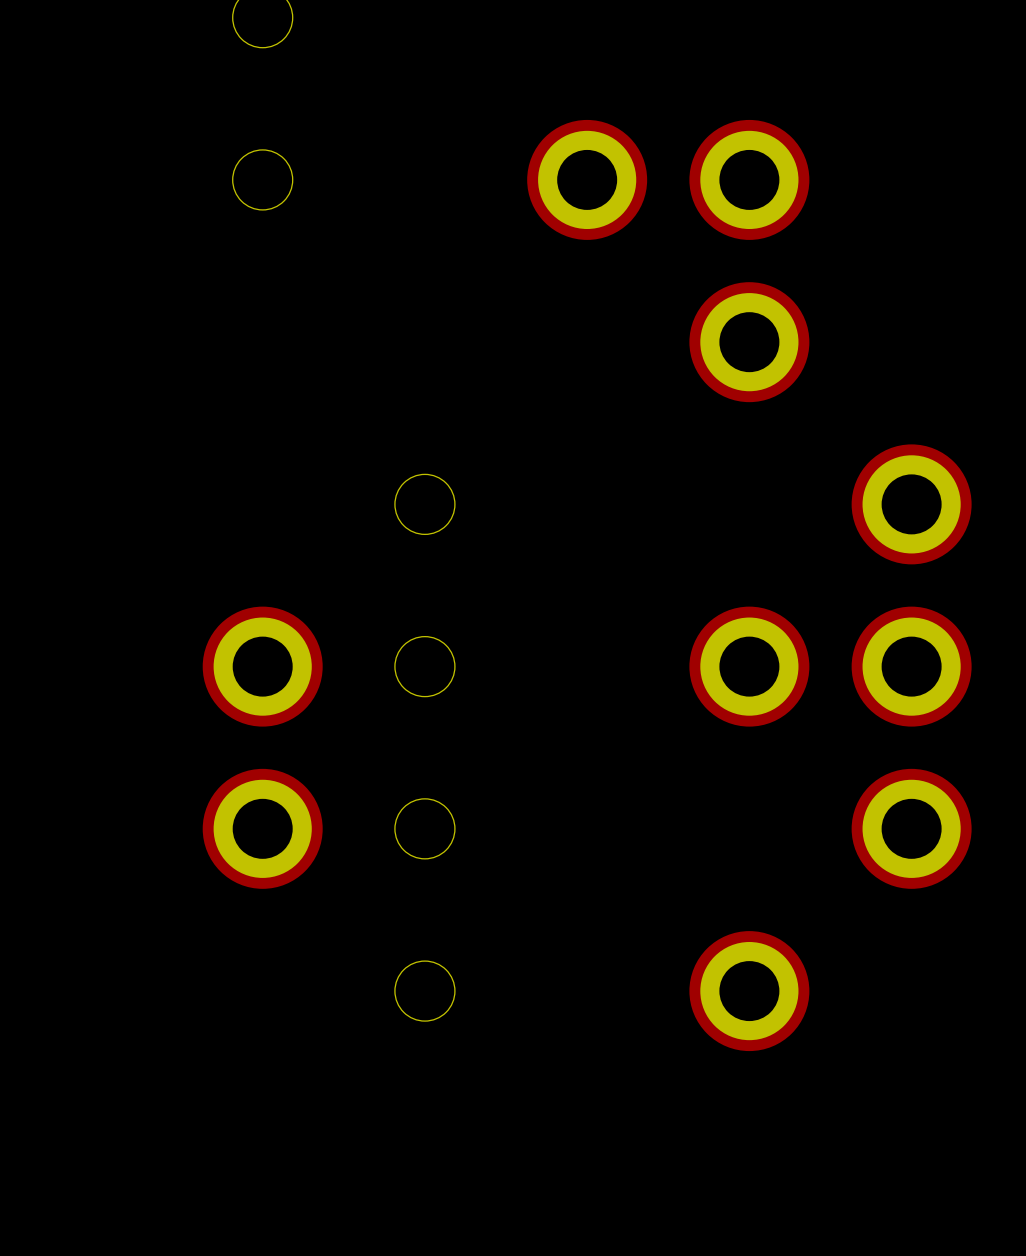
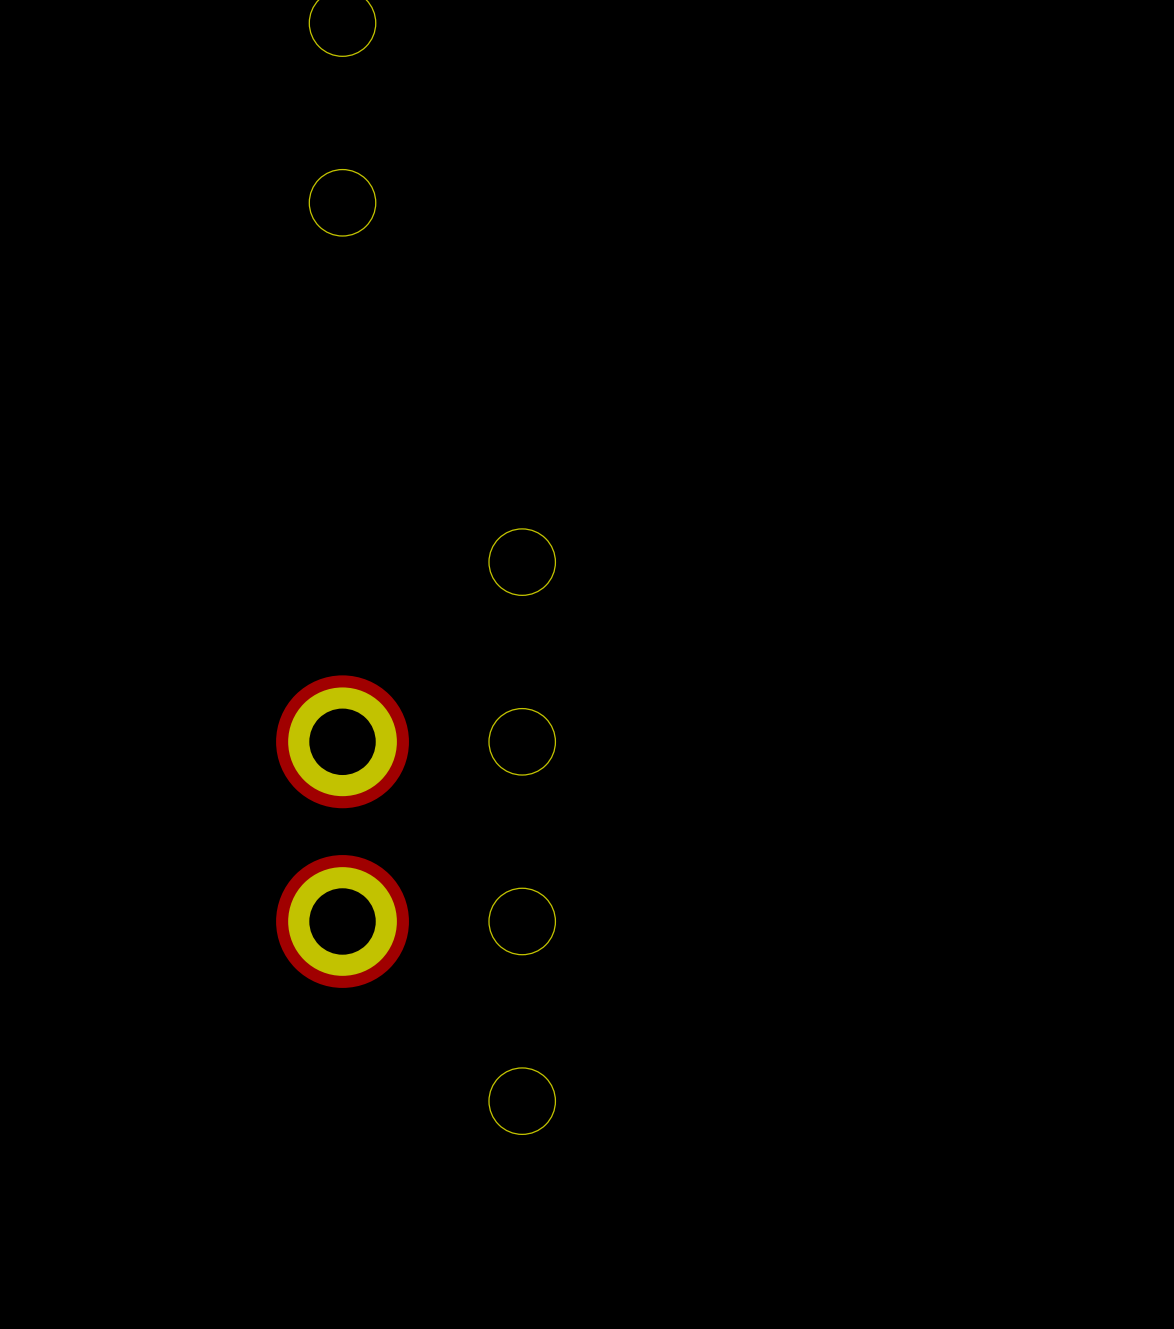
part: (587, 179) -> none
part: (749, 179) -> none
part: (749, 342) -> none
part: (911, 504) -> none
part: (749, 666) -> none
part: (911, 666) -> none
part: (911, 828) -> none
part: (749, 991) -> none

